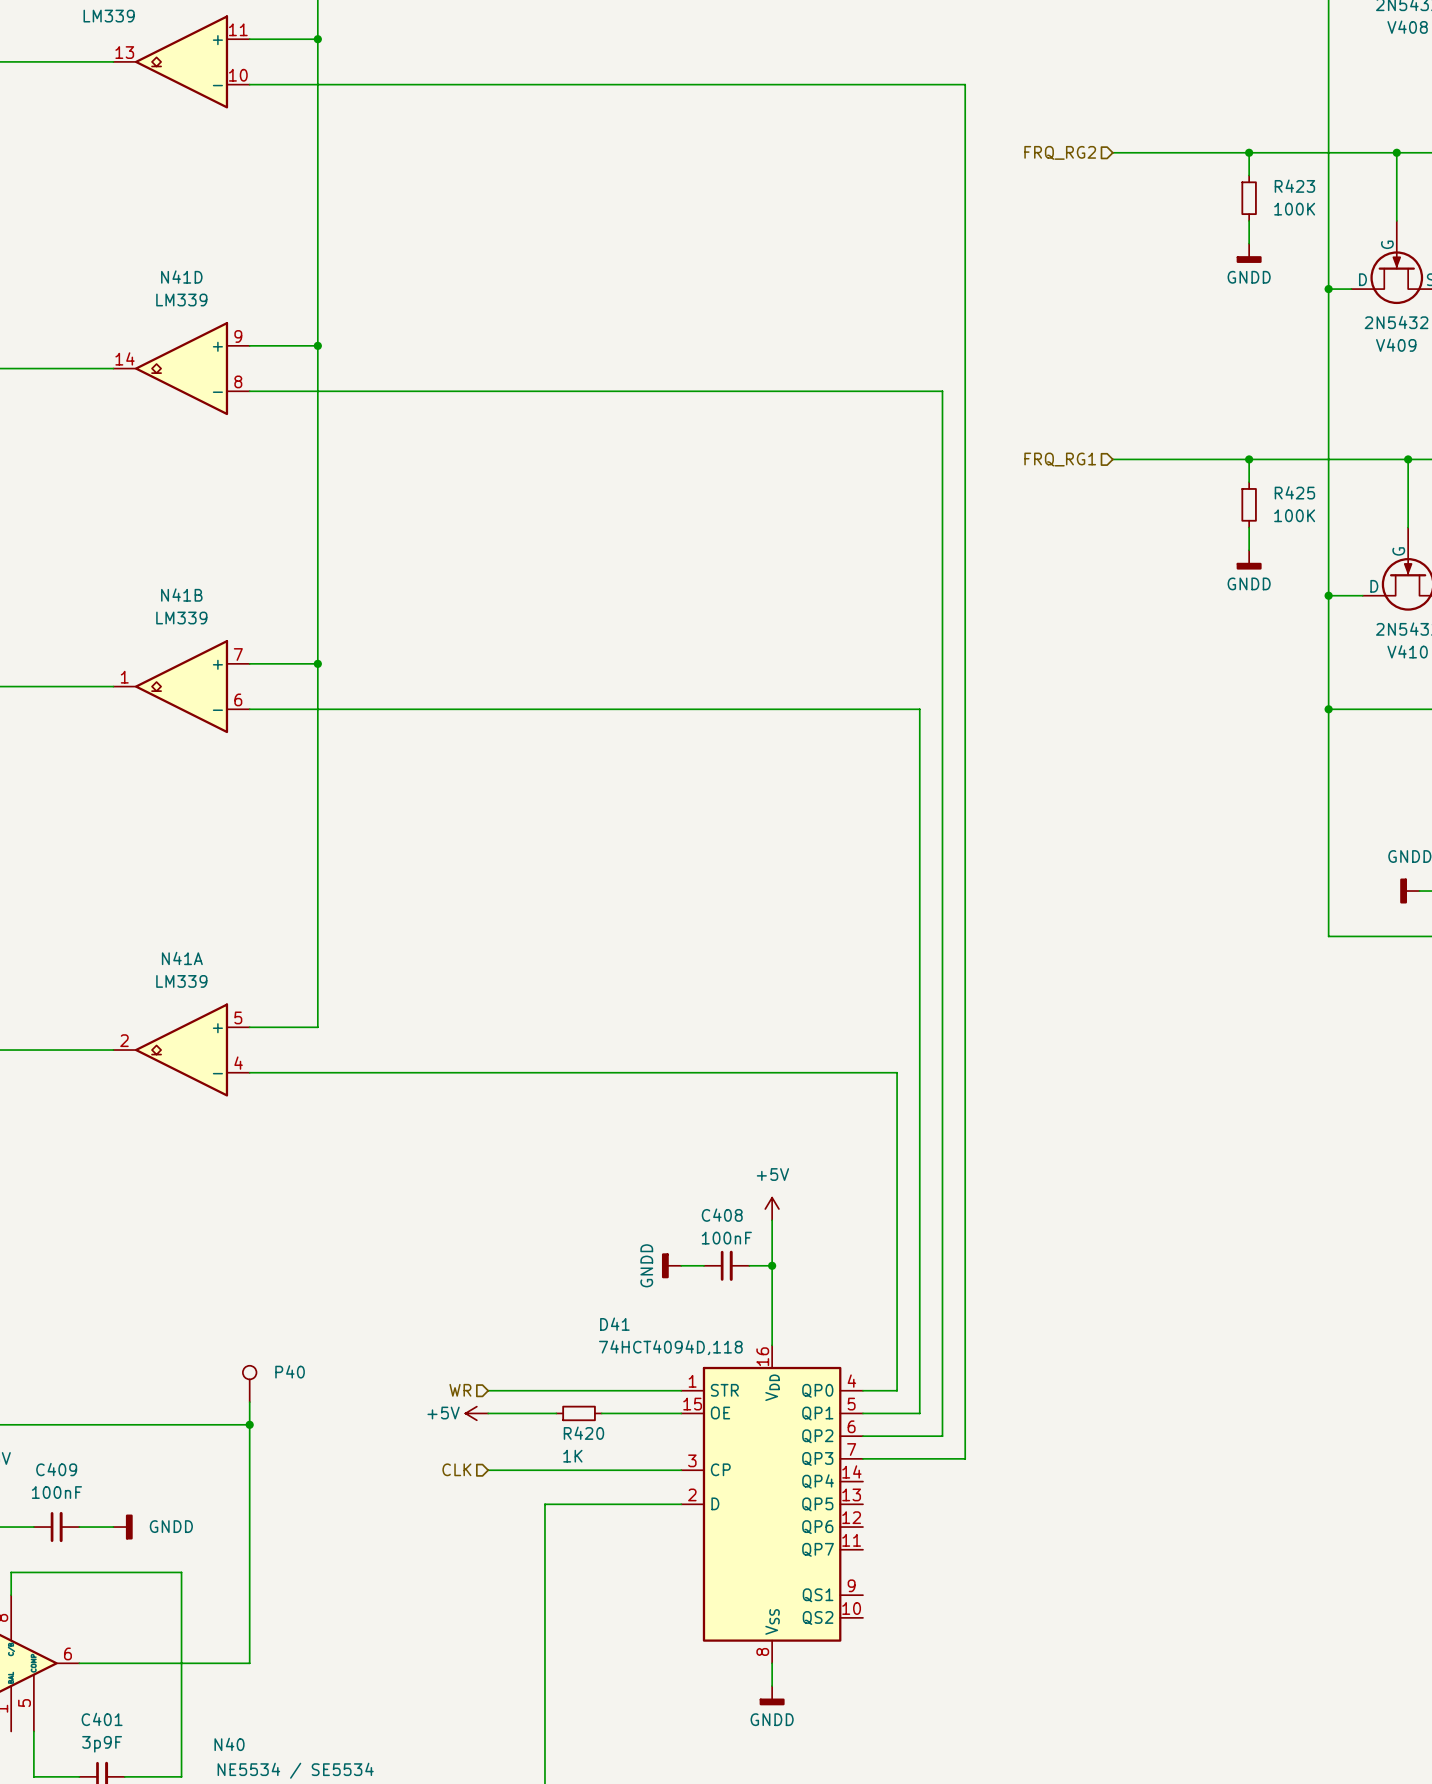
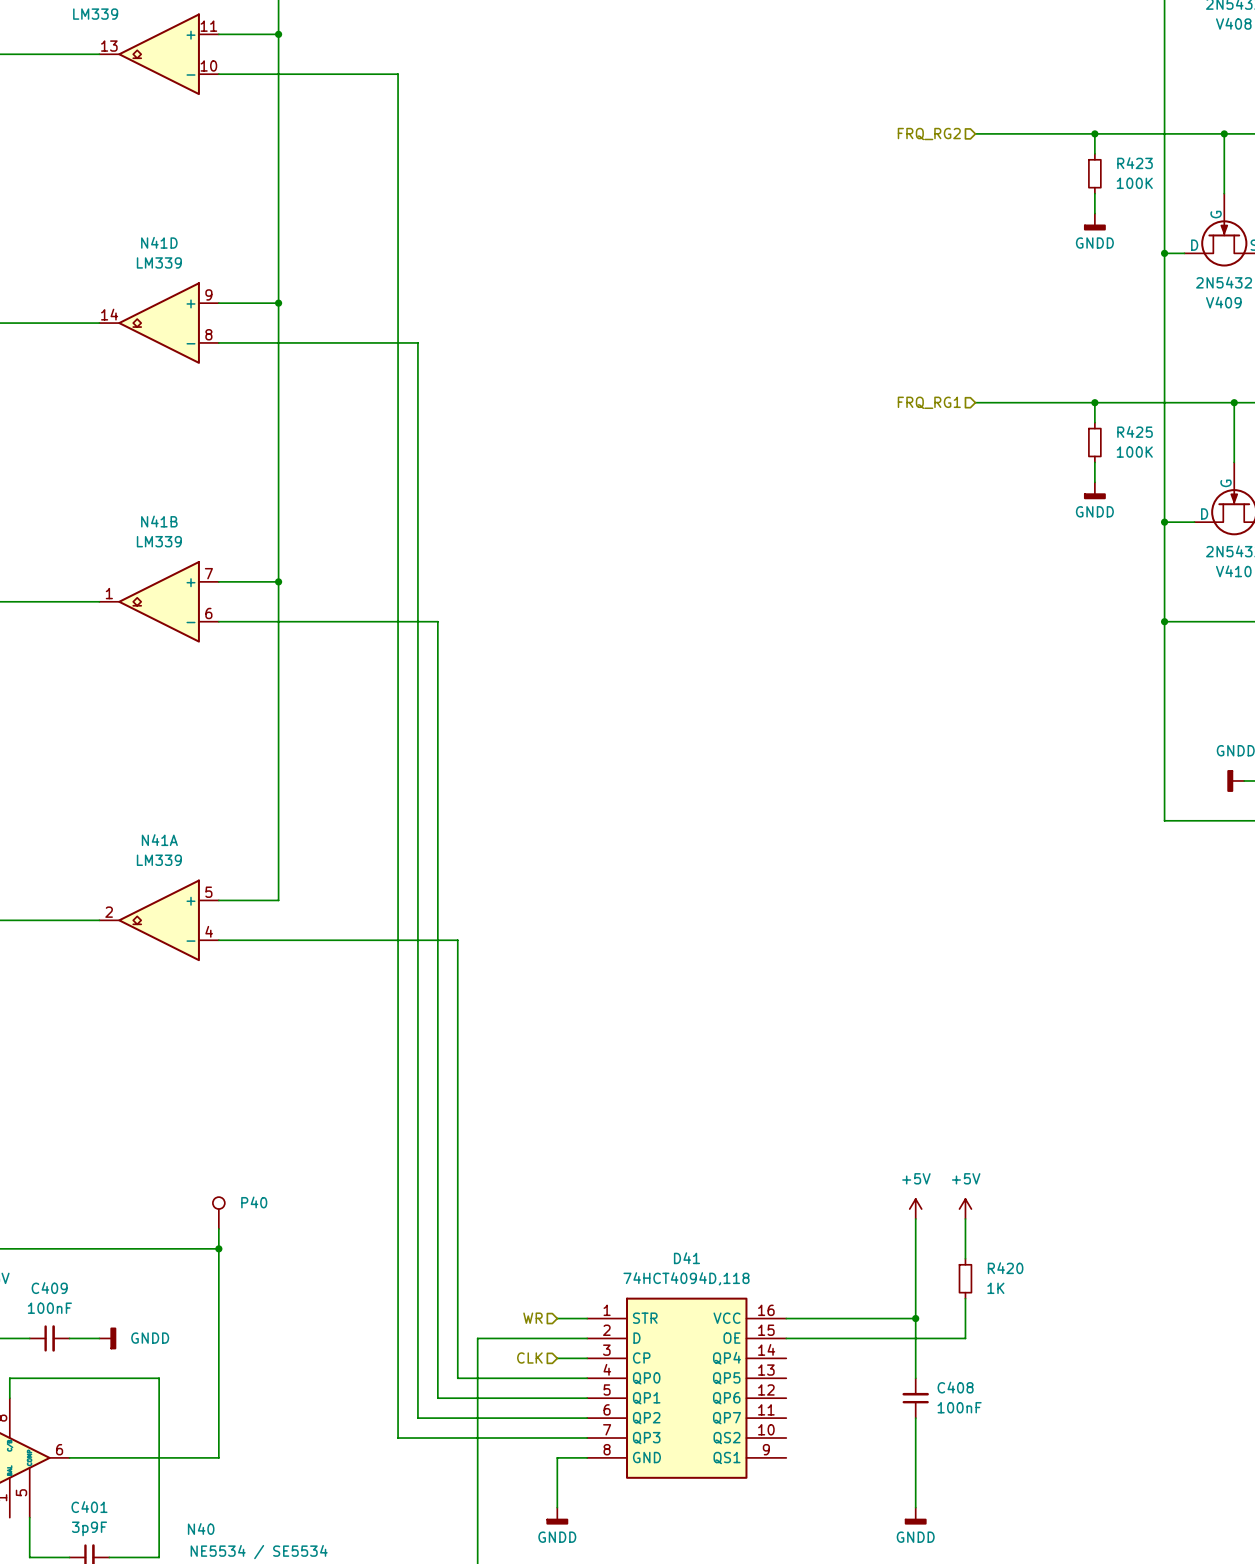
wire: (454, 84) (965, 84) (965, 1458) (862, 1458) -> (398, 74) (398, 1438) (587, 1438)
wire: (476, 391) (942, 391) (942, 1436) (862, 1436) -> (417, 342) (417, 1418) (587, 1418)
wire: (499, 709) (919, 709) (919, 1413) (862, 1413) -> (437, 621) (437, 1398) (587, 1398)
wire: (522, 1072) (897, 1072) (897, 1390) (862, 1390) -> (457, 940) (457, 1378) (587, 1378)
power symbol: +5V (772, 1209) -> none
C408 name position: C408 (722, 1215) -> C408 (955, 1387)
wire: (772, 1220) (772, 1345) -> none
C408 value position: 100nF (726, 1238) -> 100nF (959, 1407)
power symbol: GNDD (671, 1265) -> none
wire: (681, 1265) (703, 1265) -> none
C408 rotation: 0° (726, 1265) -> 90° counterclockwise (915, 1398)
C408 position: (726, 1265) -> (915, 1398)
wire: (749, 1265) (772, 1265) -> none
junction: (772, 1265) -> none
D41 name position: D41 (614, 1324) -> D41 (686, 1258)
D41 symbol: [681, 1345, 863, 1664] -> [587, 1297, 787, 1479]
D41 value position: 74HCT4094D,118 (670, 1347) -> 74HCT4094D,118 (686, 1278)
power symbol: none -> +5V (915, 1209)
power symbol: none -> +5V (965, 1209)
hierarchical label position: WR (460, 1390) -> WR (532, 1318)
wire: (488, 1390) (681, 1390) -> none
wire: none -> (915, 1219) (915, 1378)
wire: none -> (965, 1219) (965, 1258)
power symbol: +5V (476, 1413) -> none
wire: (488, 1413) (556, 1413) -> none
R420 rotation: 0° (579, 1413) -> 90° clockwise (965, 1278)
R420 position: (579, 1413) -> (965, 1278)
wire: (601, 1413) (681, 1413) -> none
R420 name position: R420 (583, 1433) -> R420 (1005, 1268)
R420 value position: 1K (572, 1456) -> 1K (995, 1288)
hierarchical label position: CLK (456, 1469) -> CLK (529, 1357)
wire: (488, 1470) (681, 1470) -> none
wire: none -> (965, 1298) (965, 1338) (786, 1338)
wire: (635, 1504) (544, 1504) (544, 1527) -> (587, 1338) (477, 1338)
wire: none -> (786, 1318) (915, 1318)
junction: none -> (915, 1318)
wire: none -> (557, 1358) (587, 1358)
wire: none -> (915, 1418) (915, 1507)
wire: none -> (587, 1457) (557, 1457) (557, 1507)
power symbol: GNDD (772, 1695) -> none
power symbol: none -> GNDD (557, 1516)
power symbol: none -> GNDD (915, 1516)

